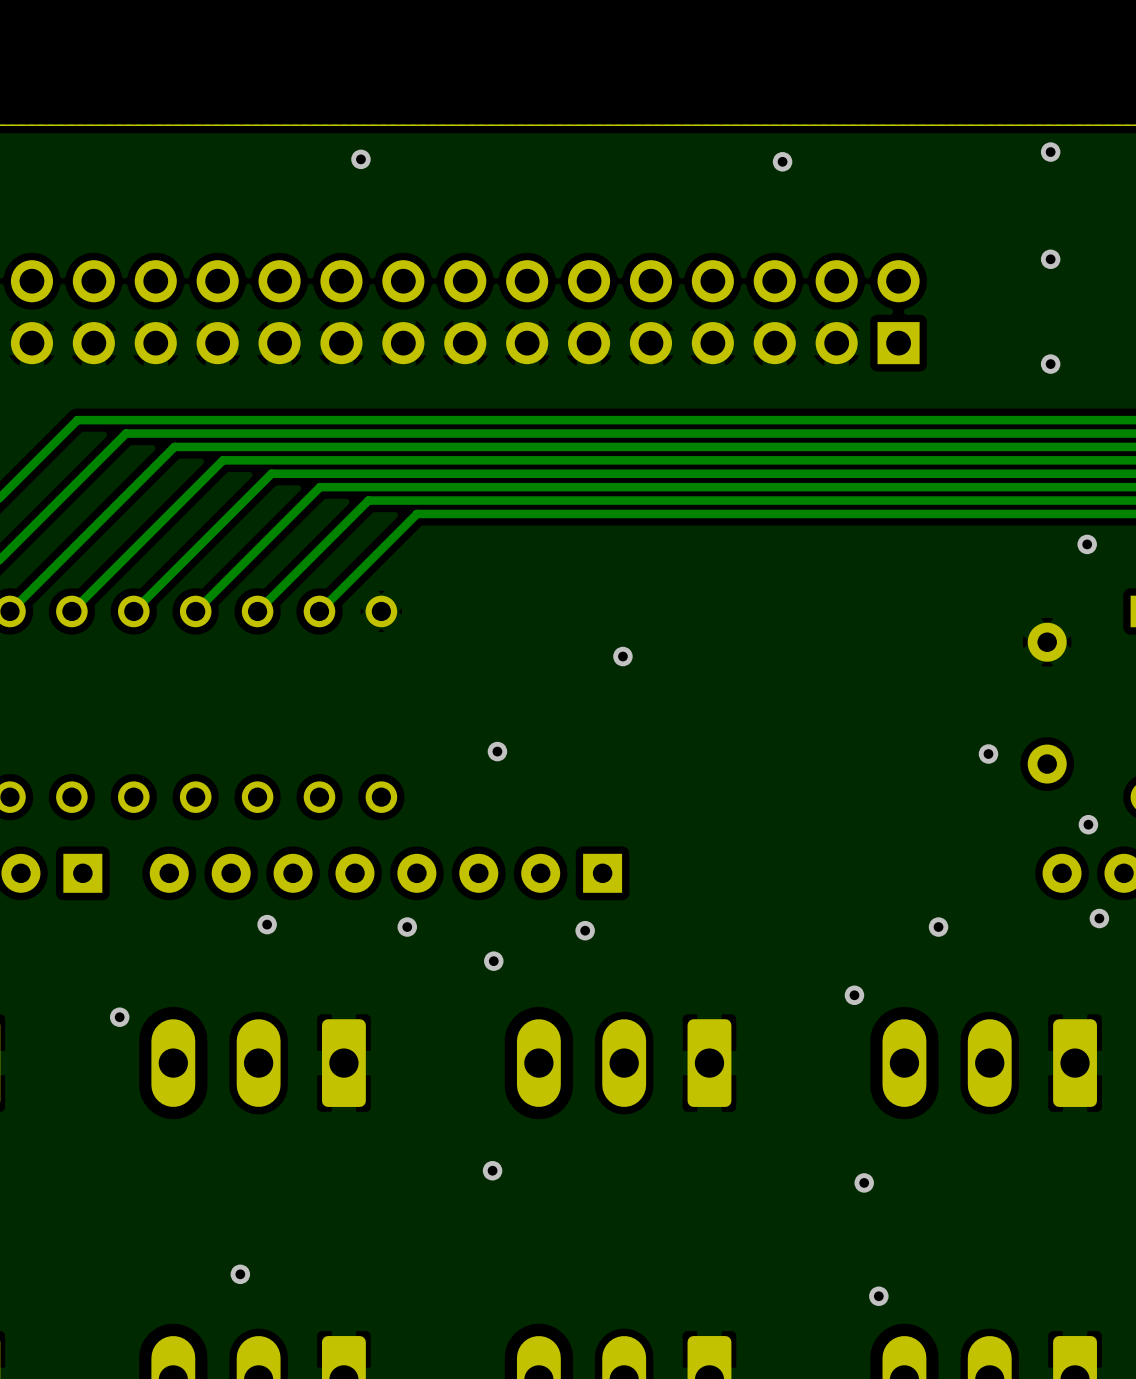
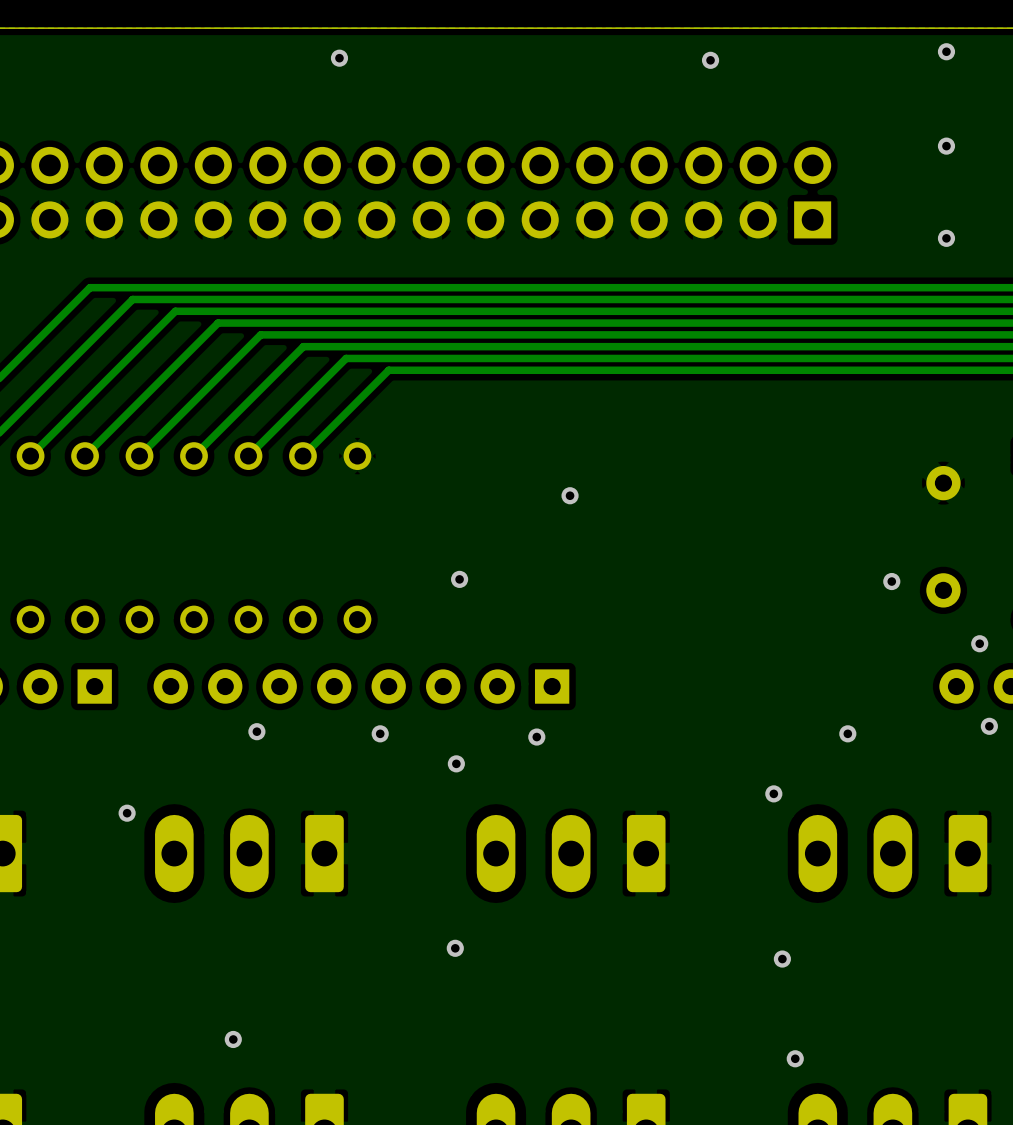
via: (1087, 544) -> none

